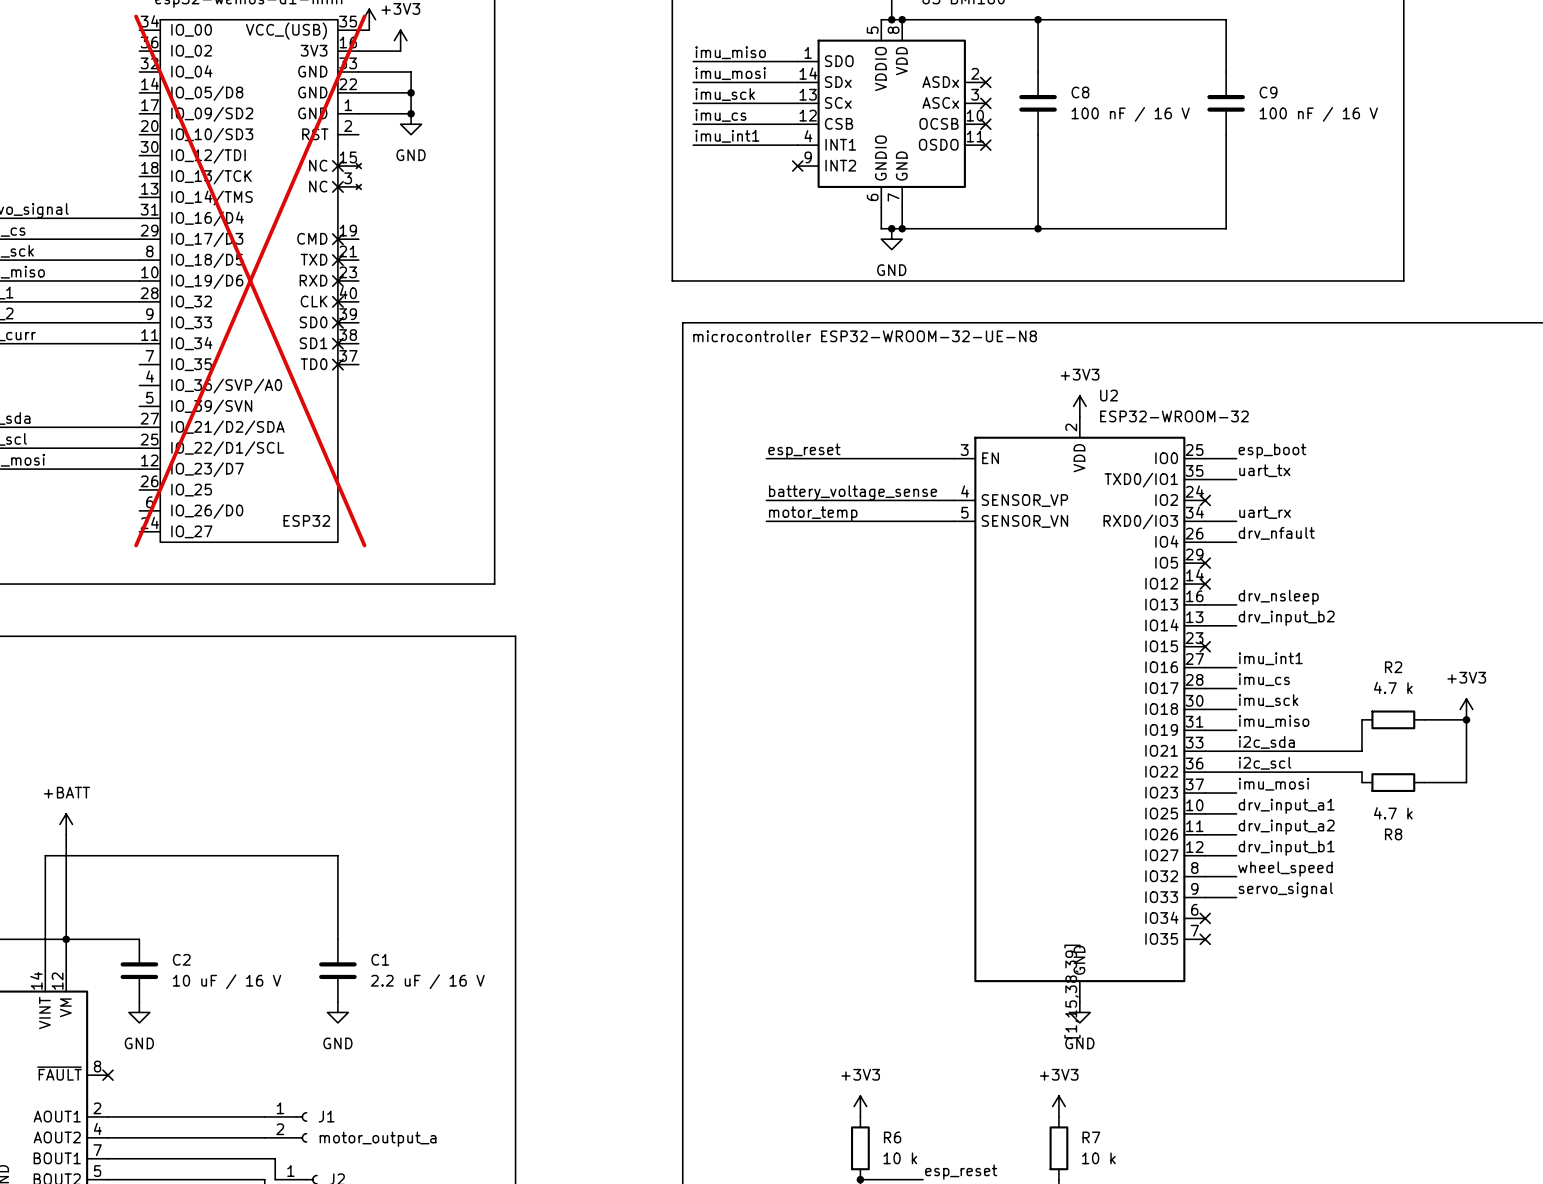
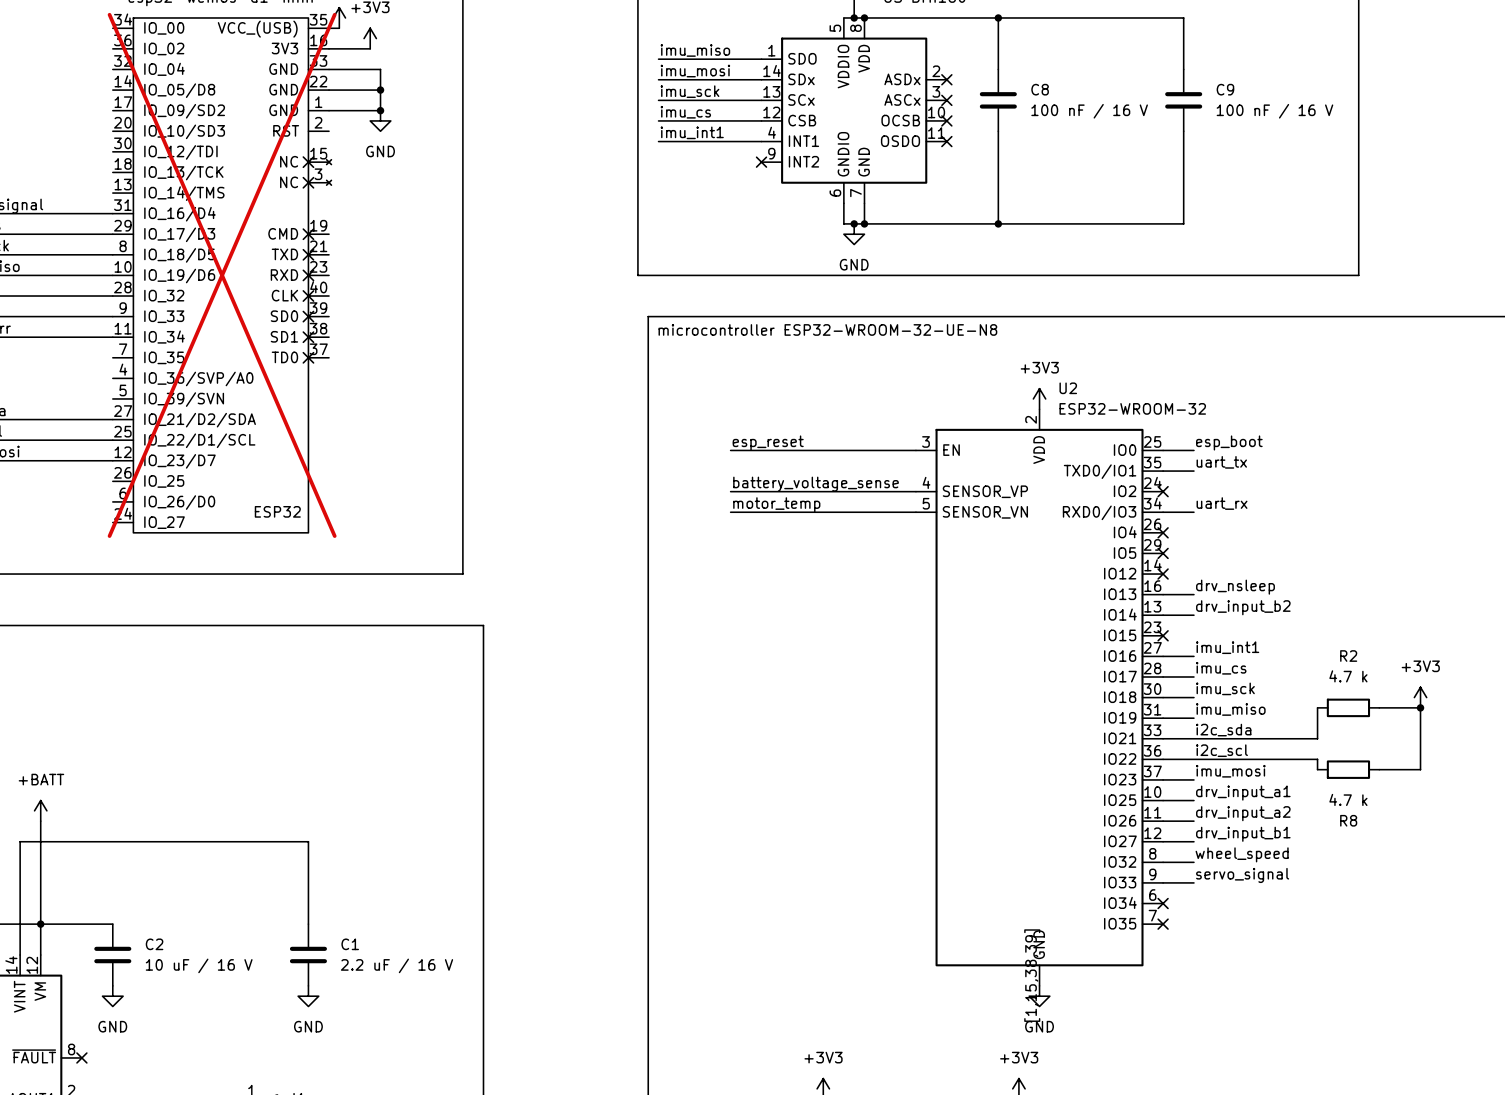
label: drv_nfault (1276, 533) -> none
wire: (1205, 542) (1236, 542) -> none
no-connect mark: none -> (1163, 532)

